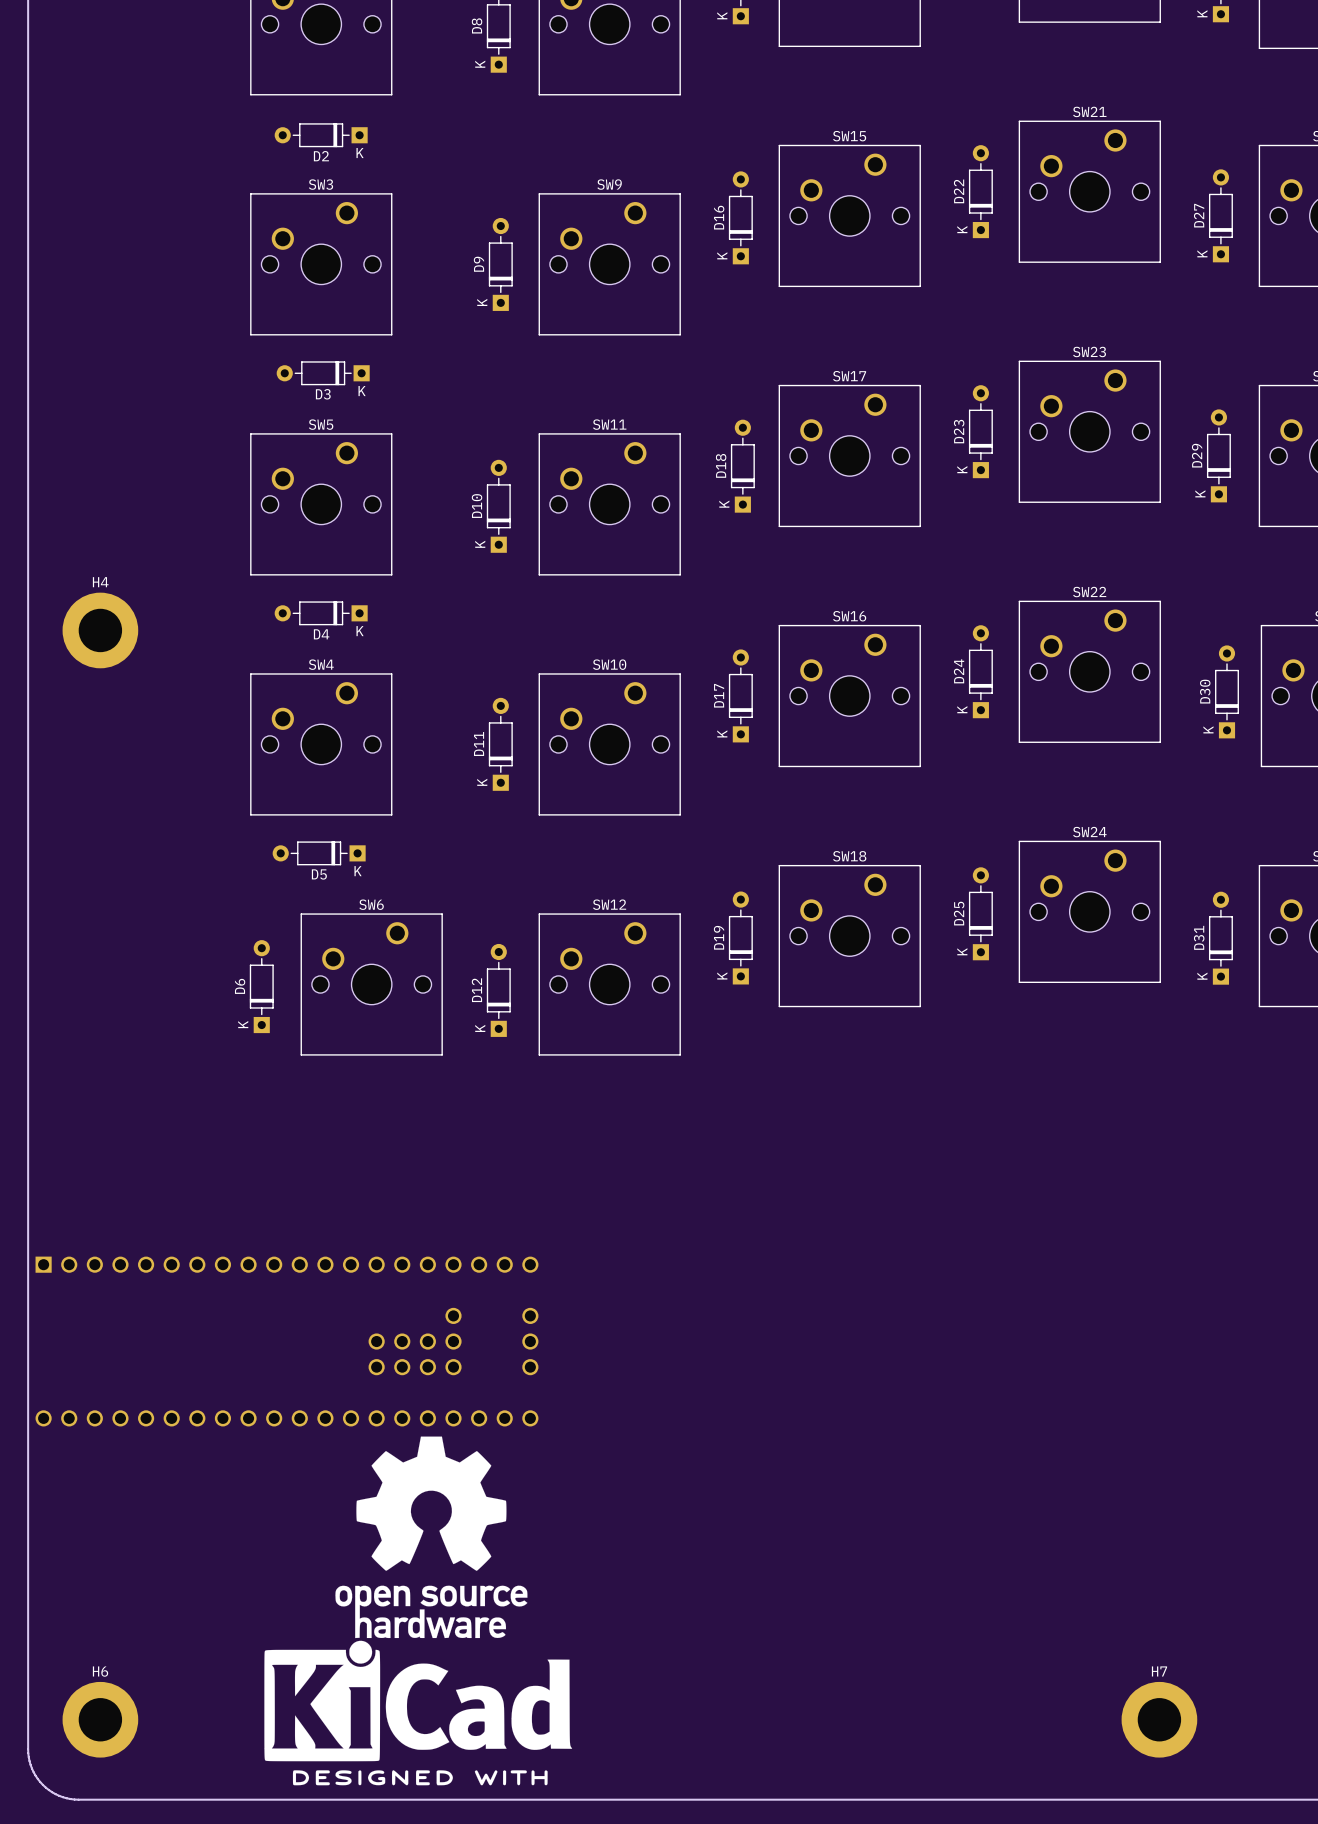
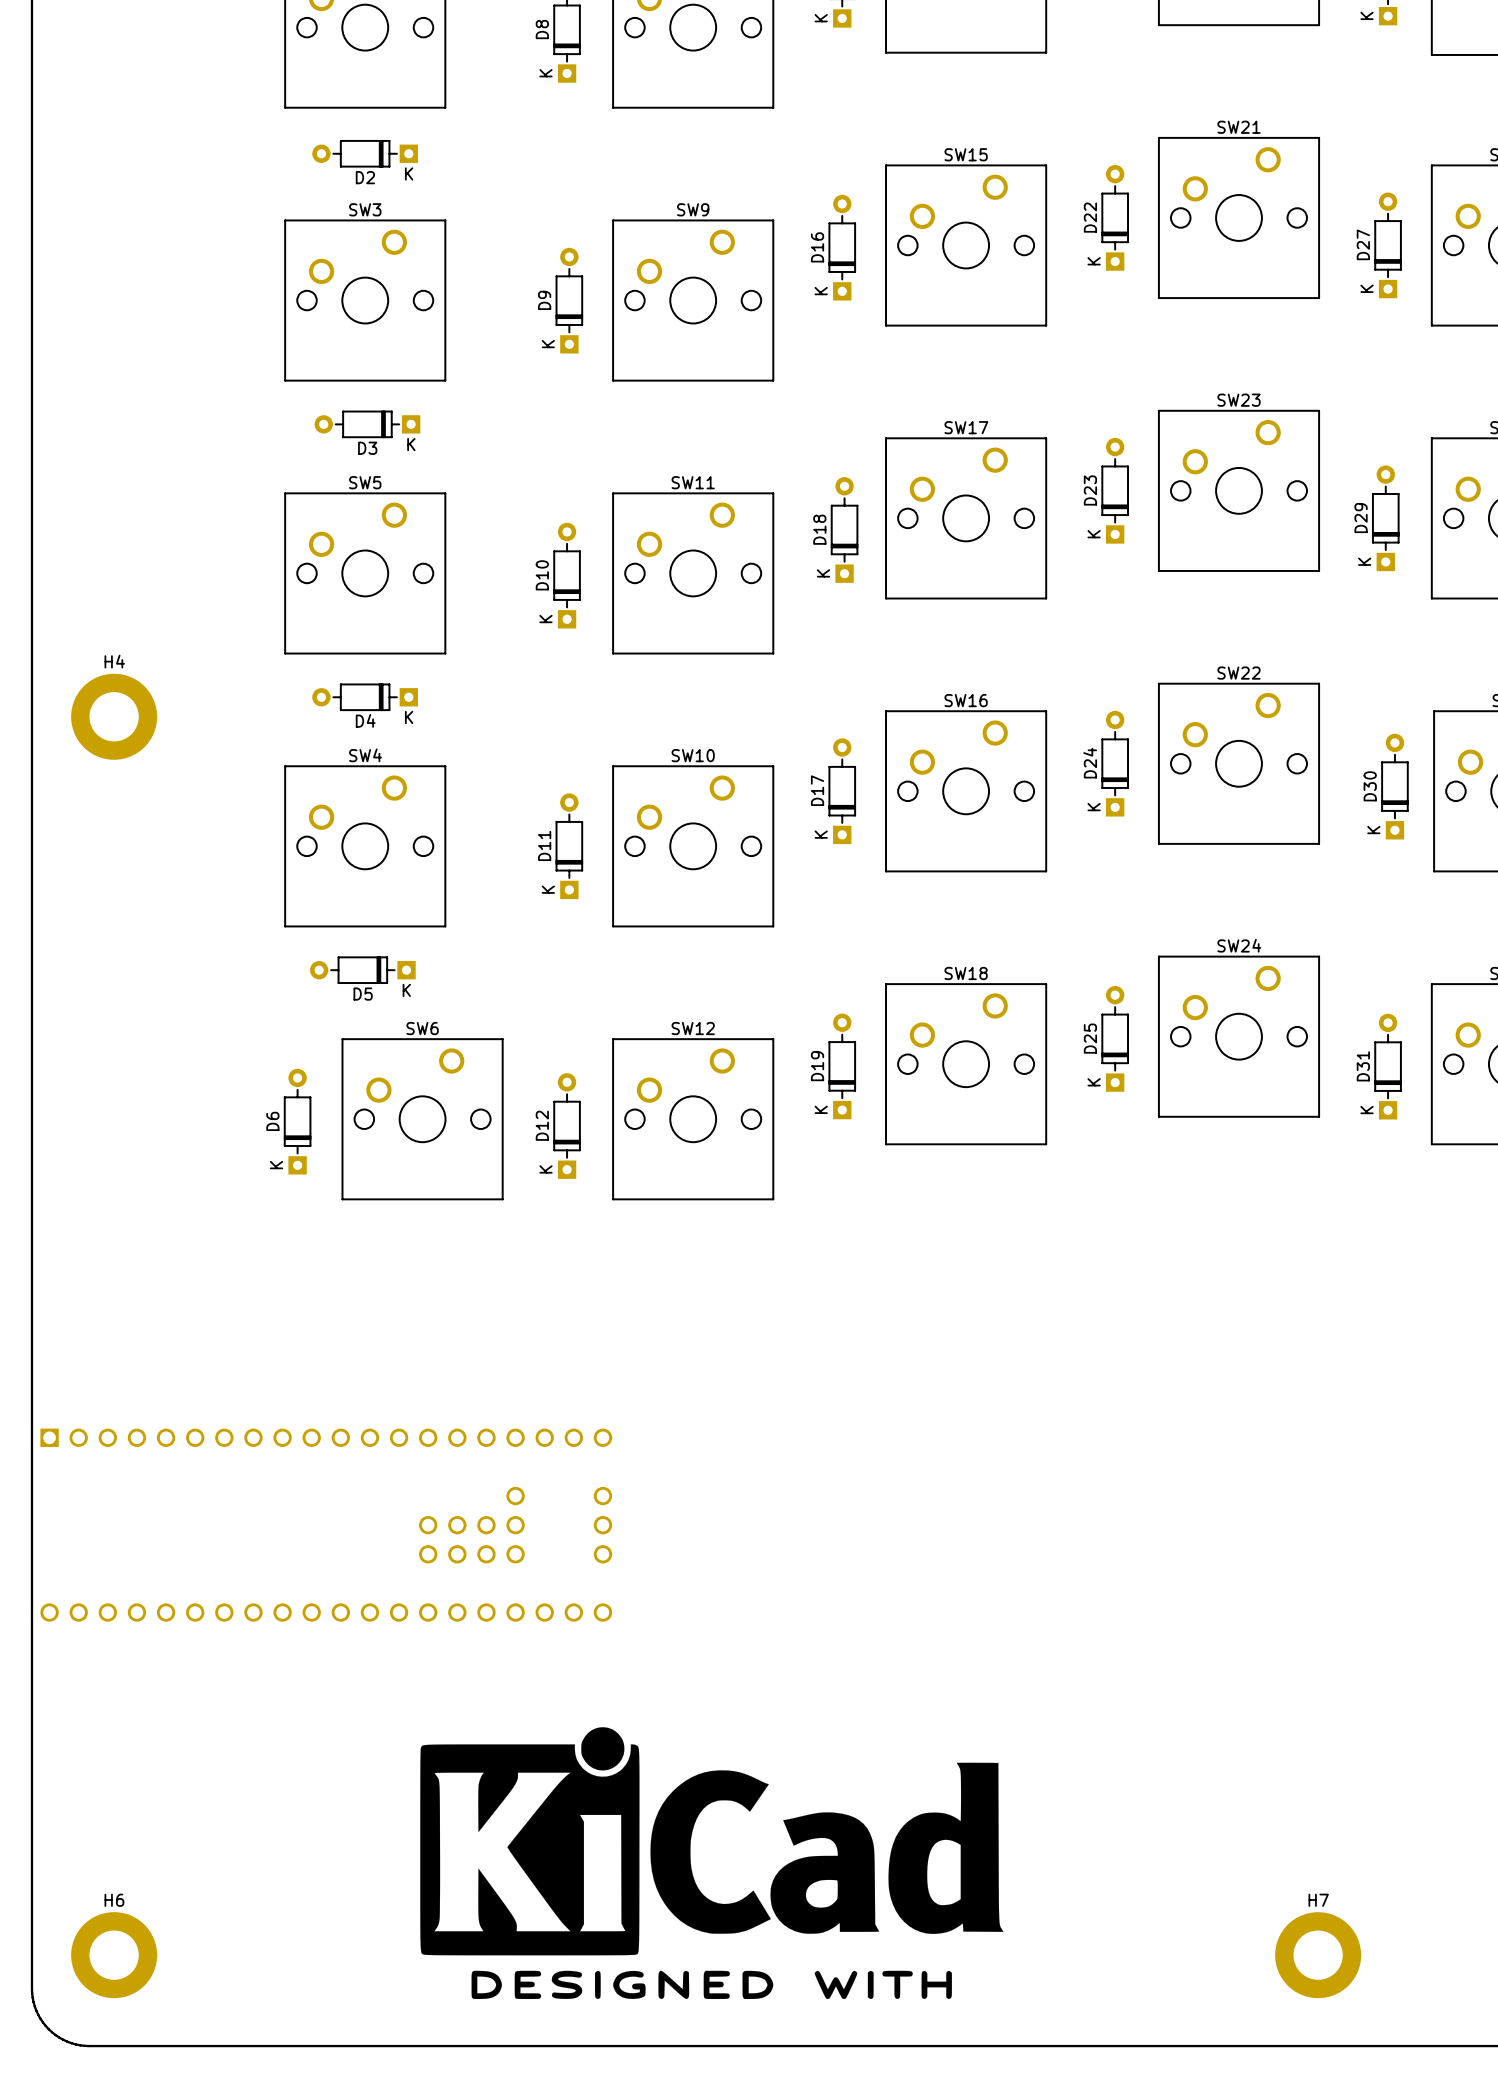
drawing: [264, 1436, 573, 1786] -> none
drawing: none -> [420, 1727, 1004, 2000]

